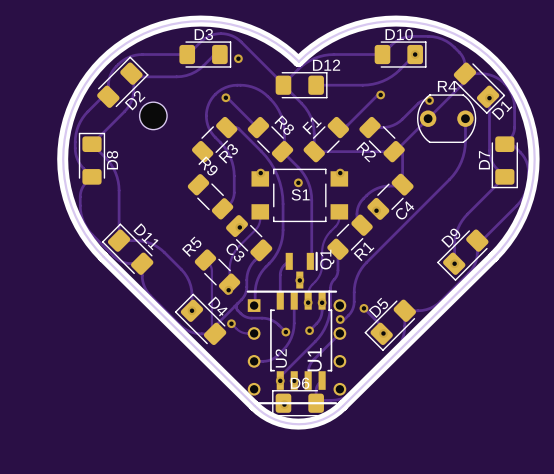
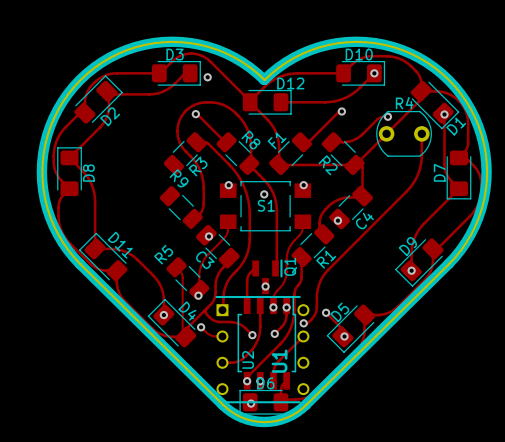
part: (153, 115) -> none

